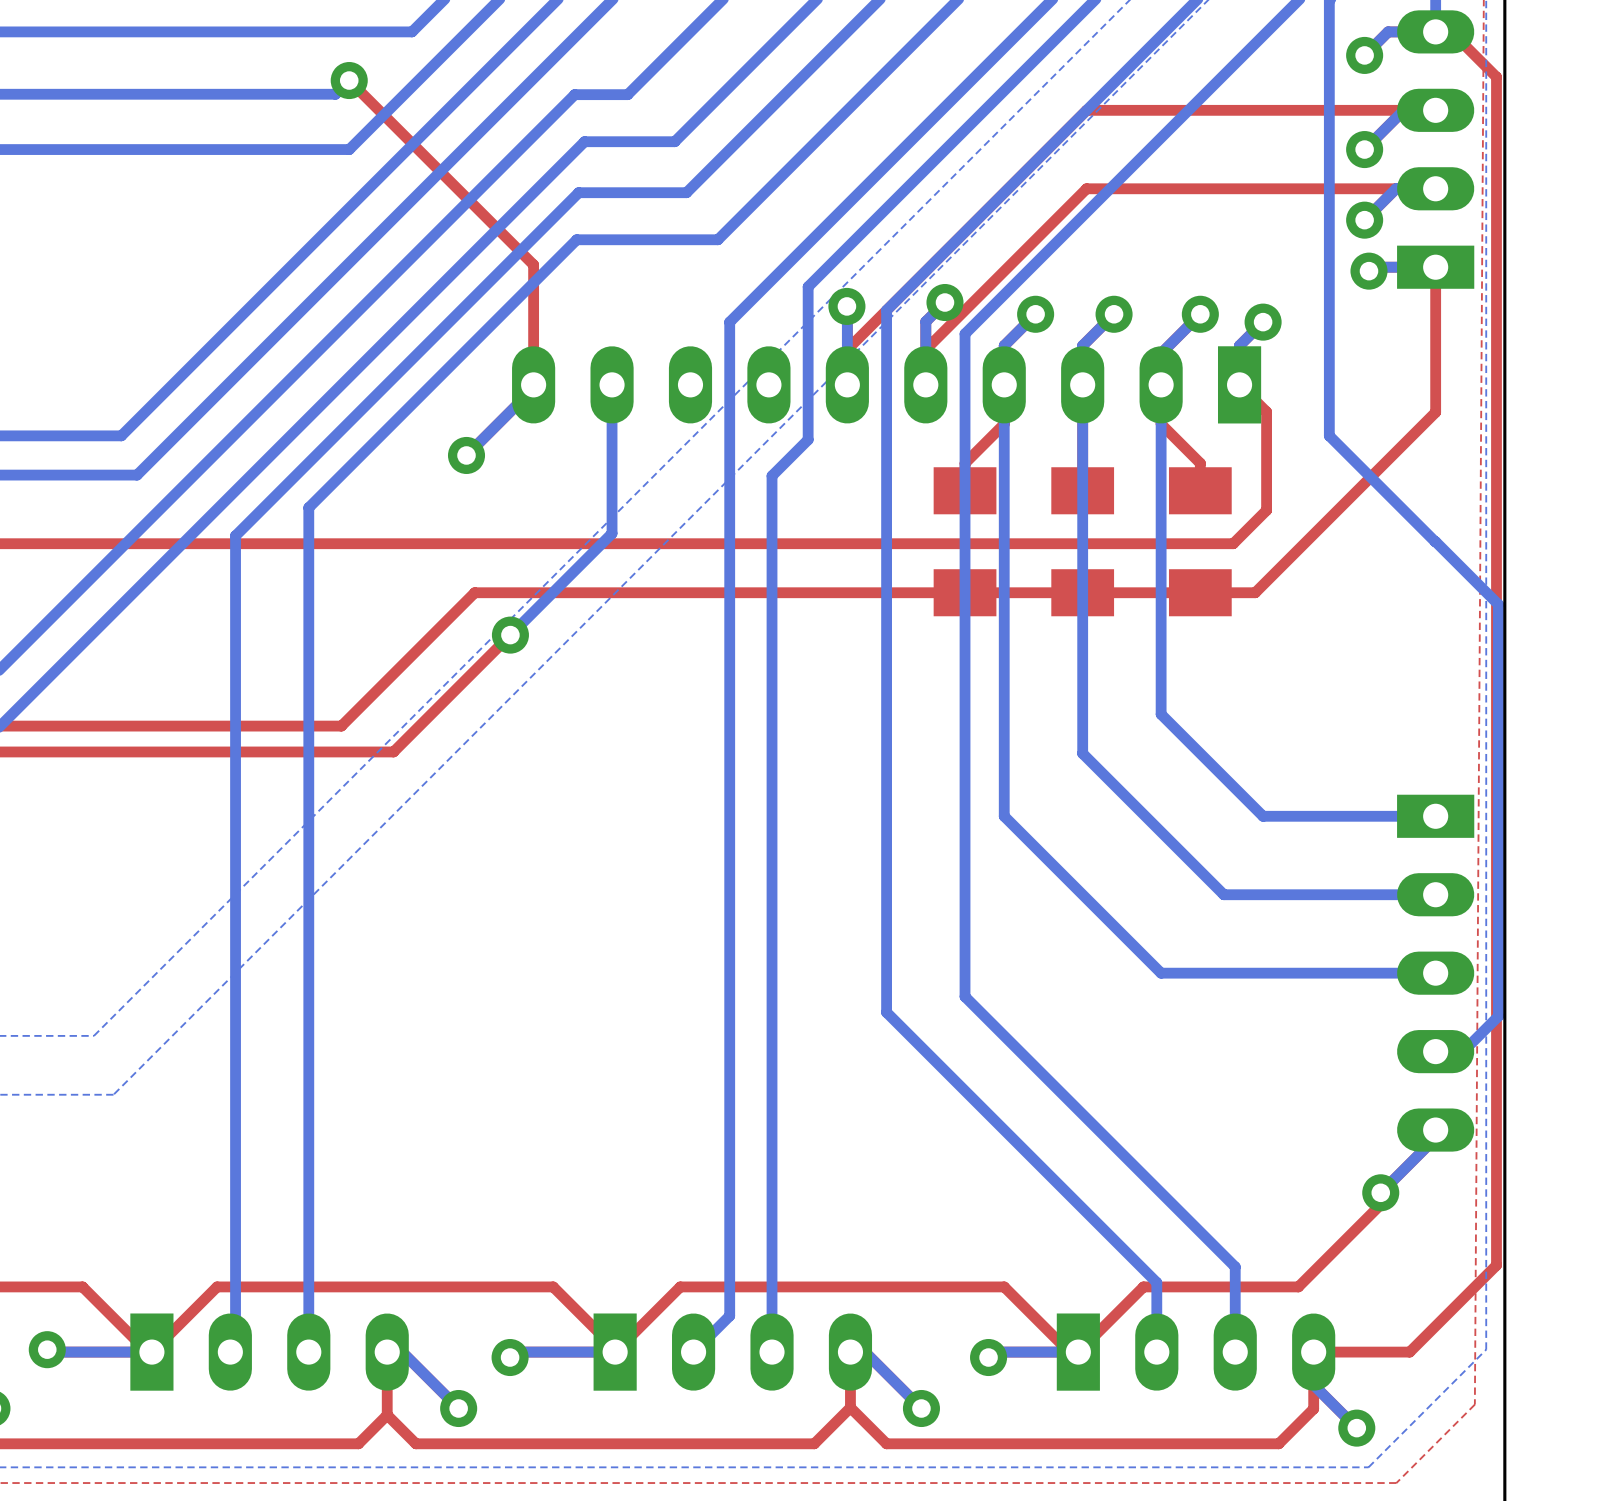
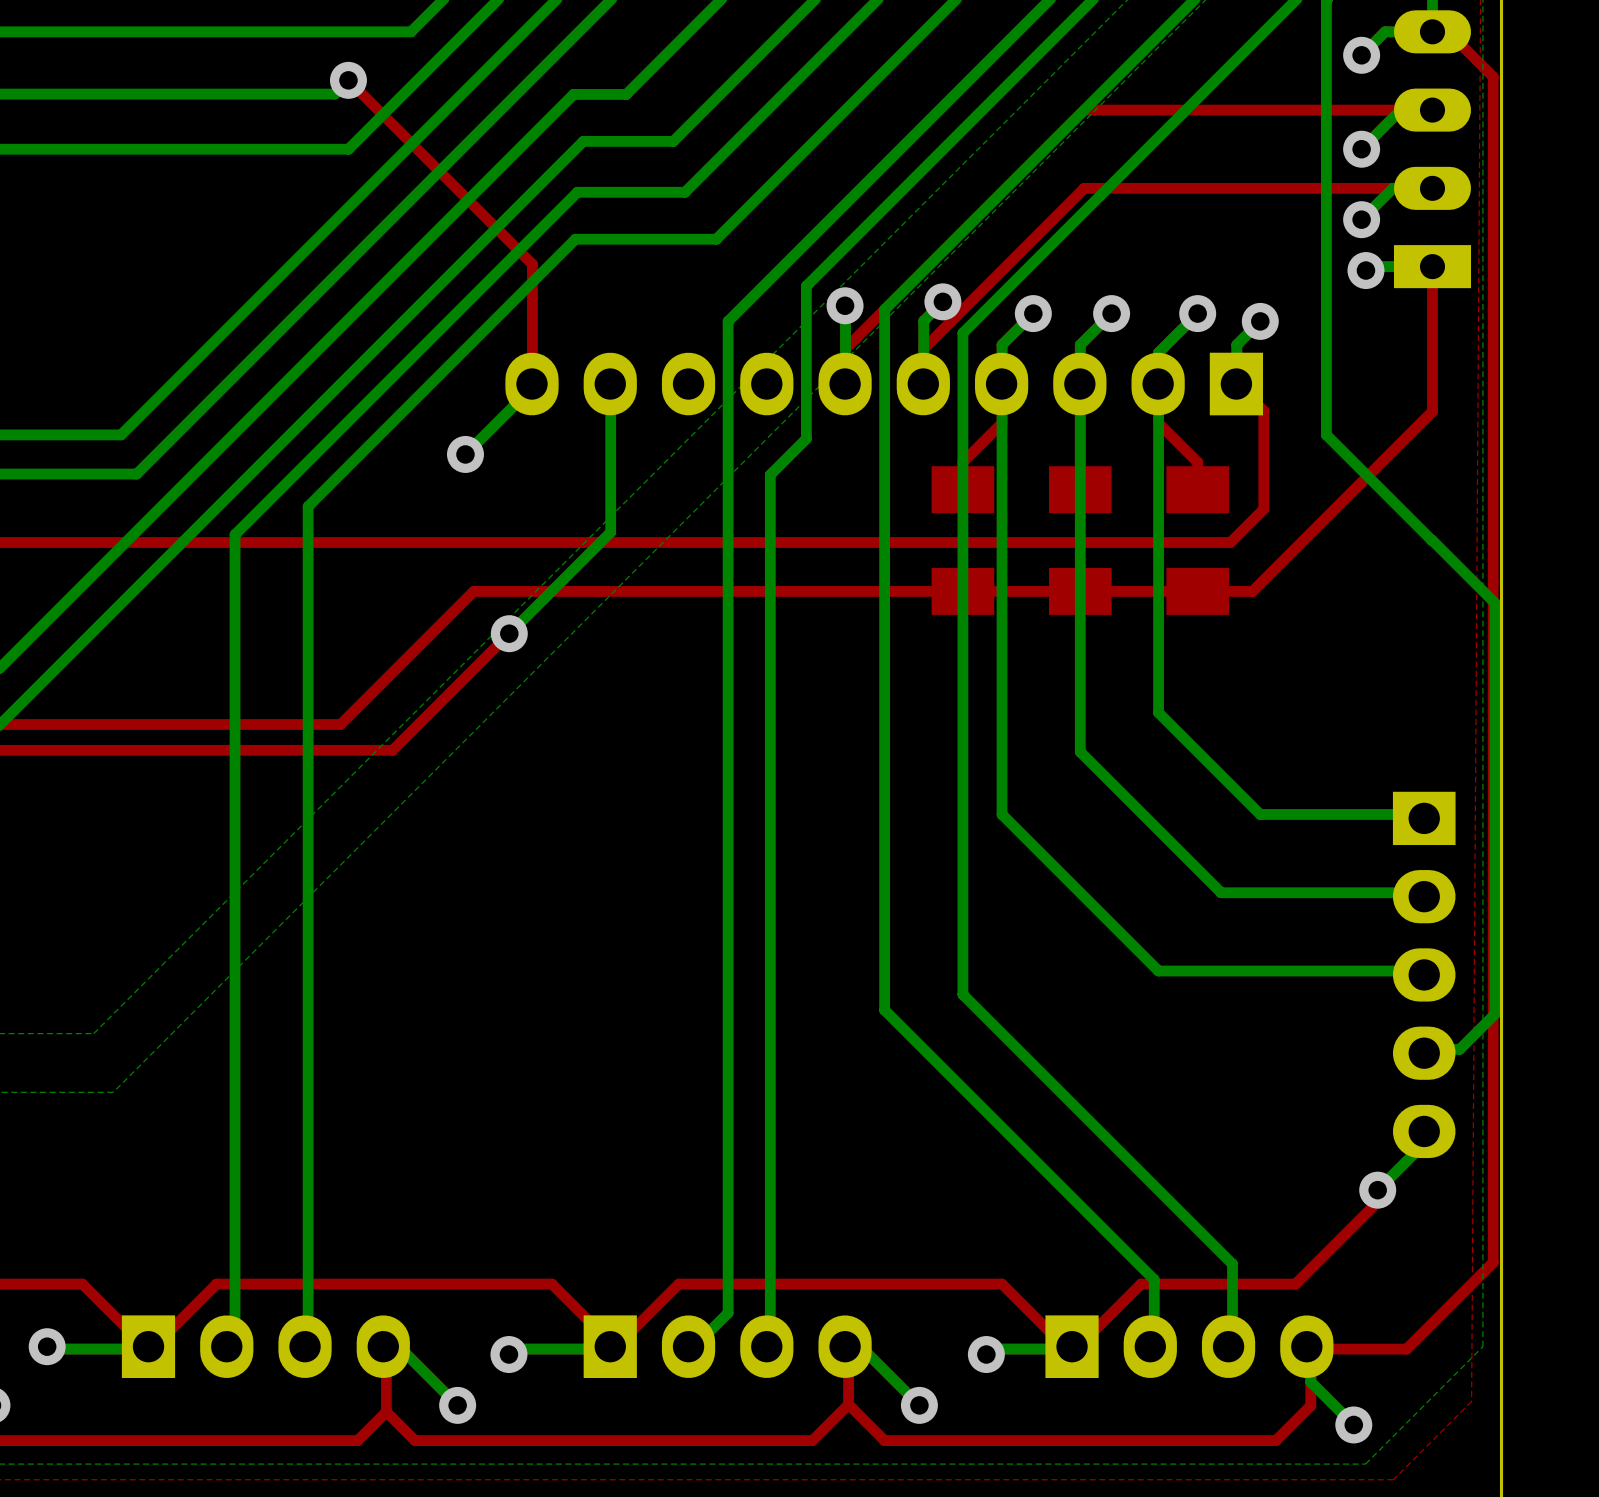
part footprint: [512, 346, 1262, 424] -> [505, 352, 1264, 416]
part footprint: [1397, 794, 1475, 1152] -> [1392, 791, 1456, 1159]
part footprint: [130, 1313, 409, 1391] -> [121, 1315, 410, 1379]
part footprint: [593, 1313, 873, 1391] -> [583, 1315, 872, 1379]
part footprint: [1056, 1313, 1336, 1391] -> [1045, 1315, 1334, 1379]

